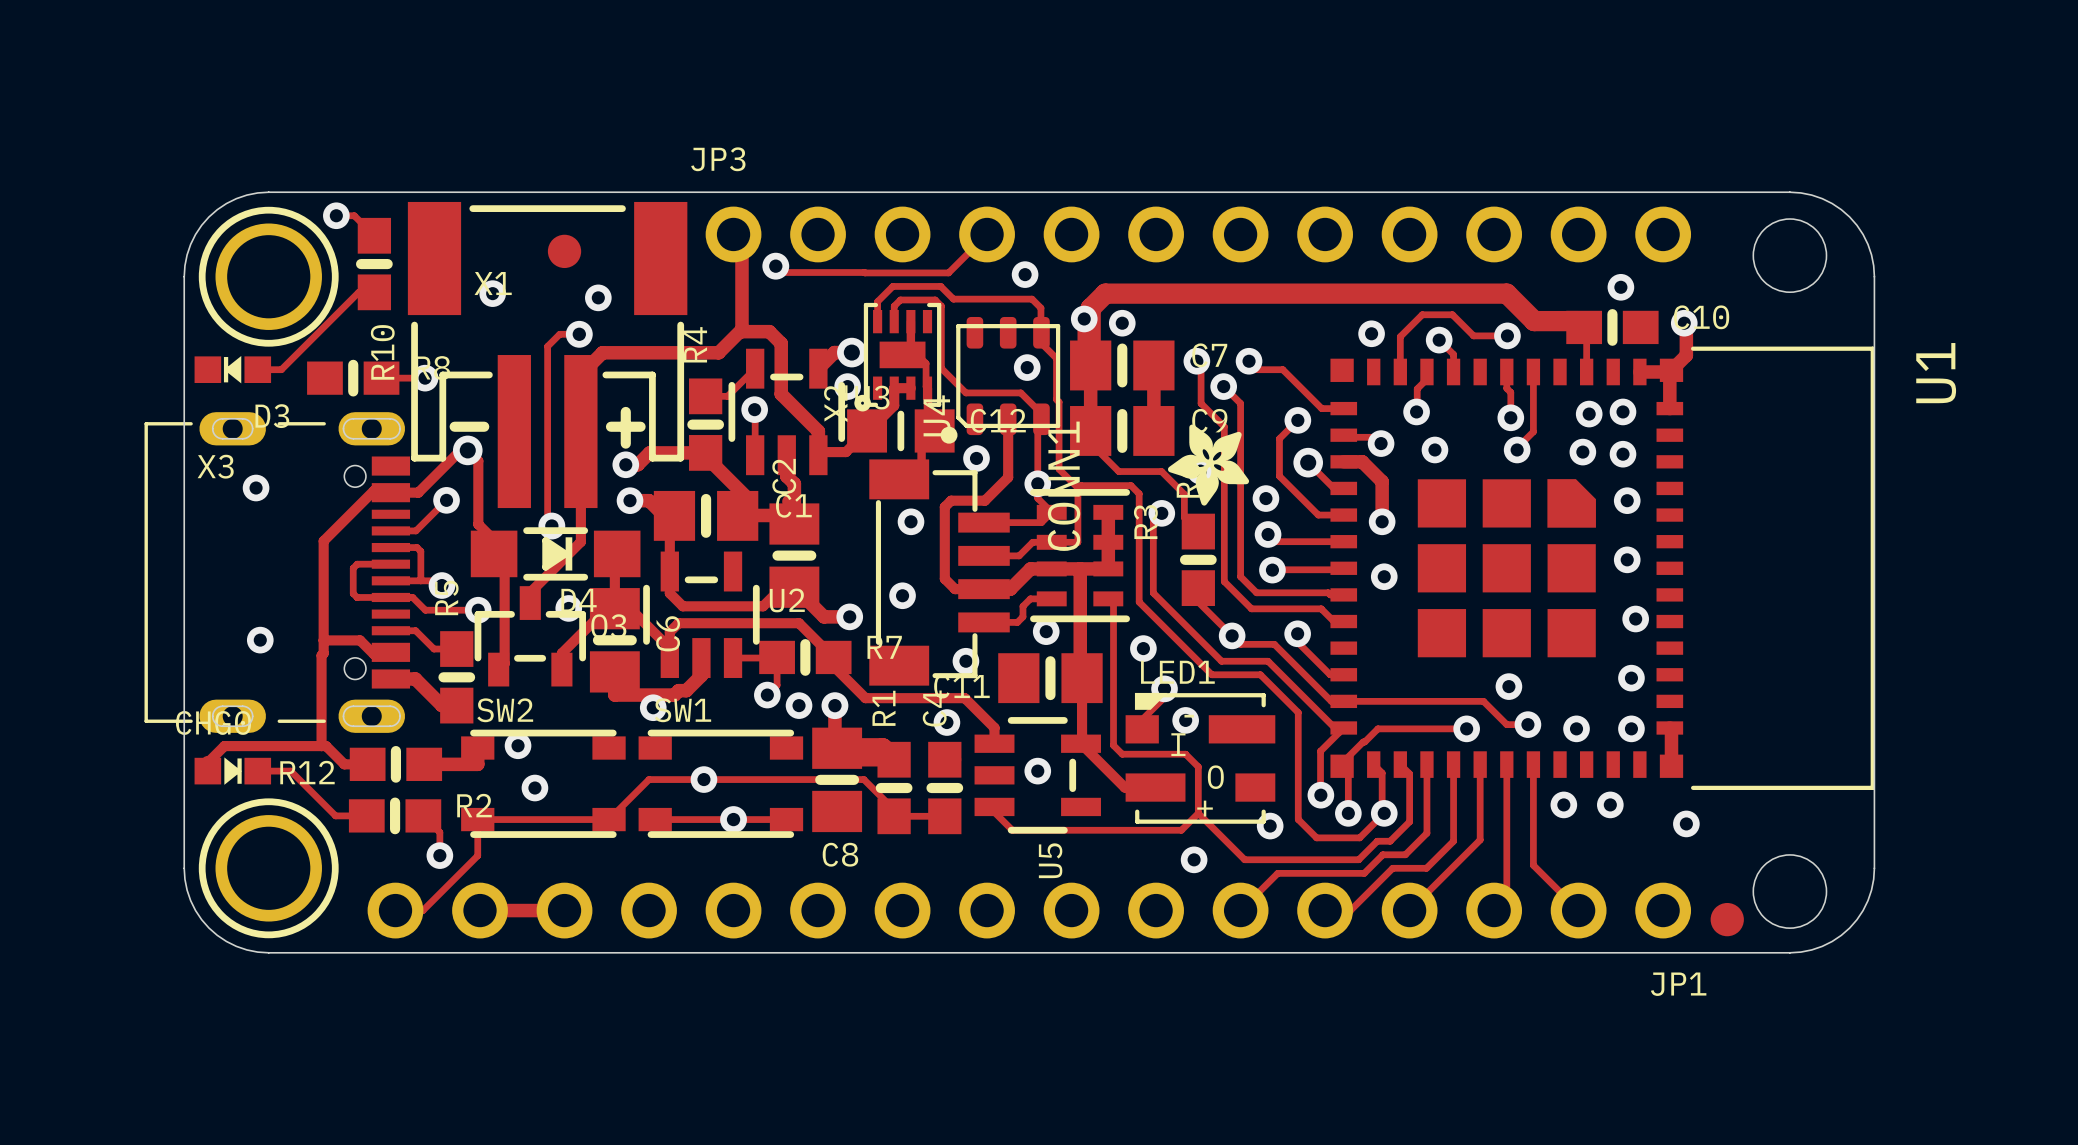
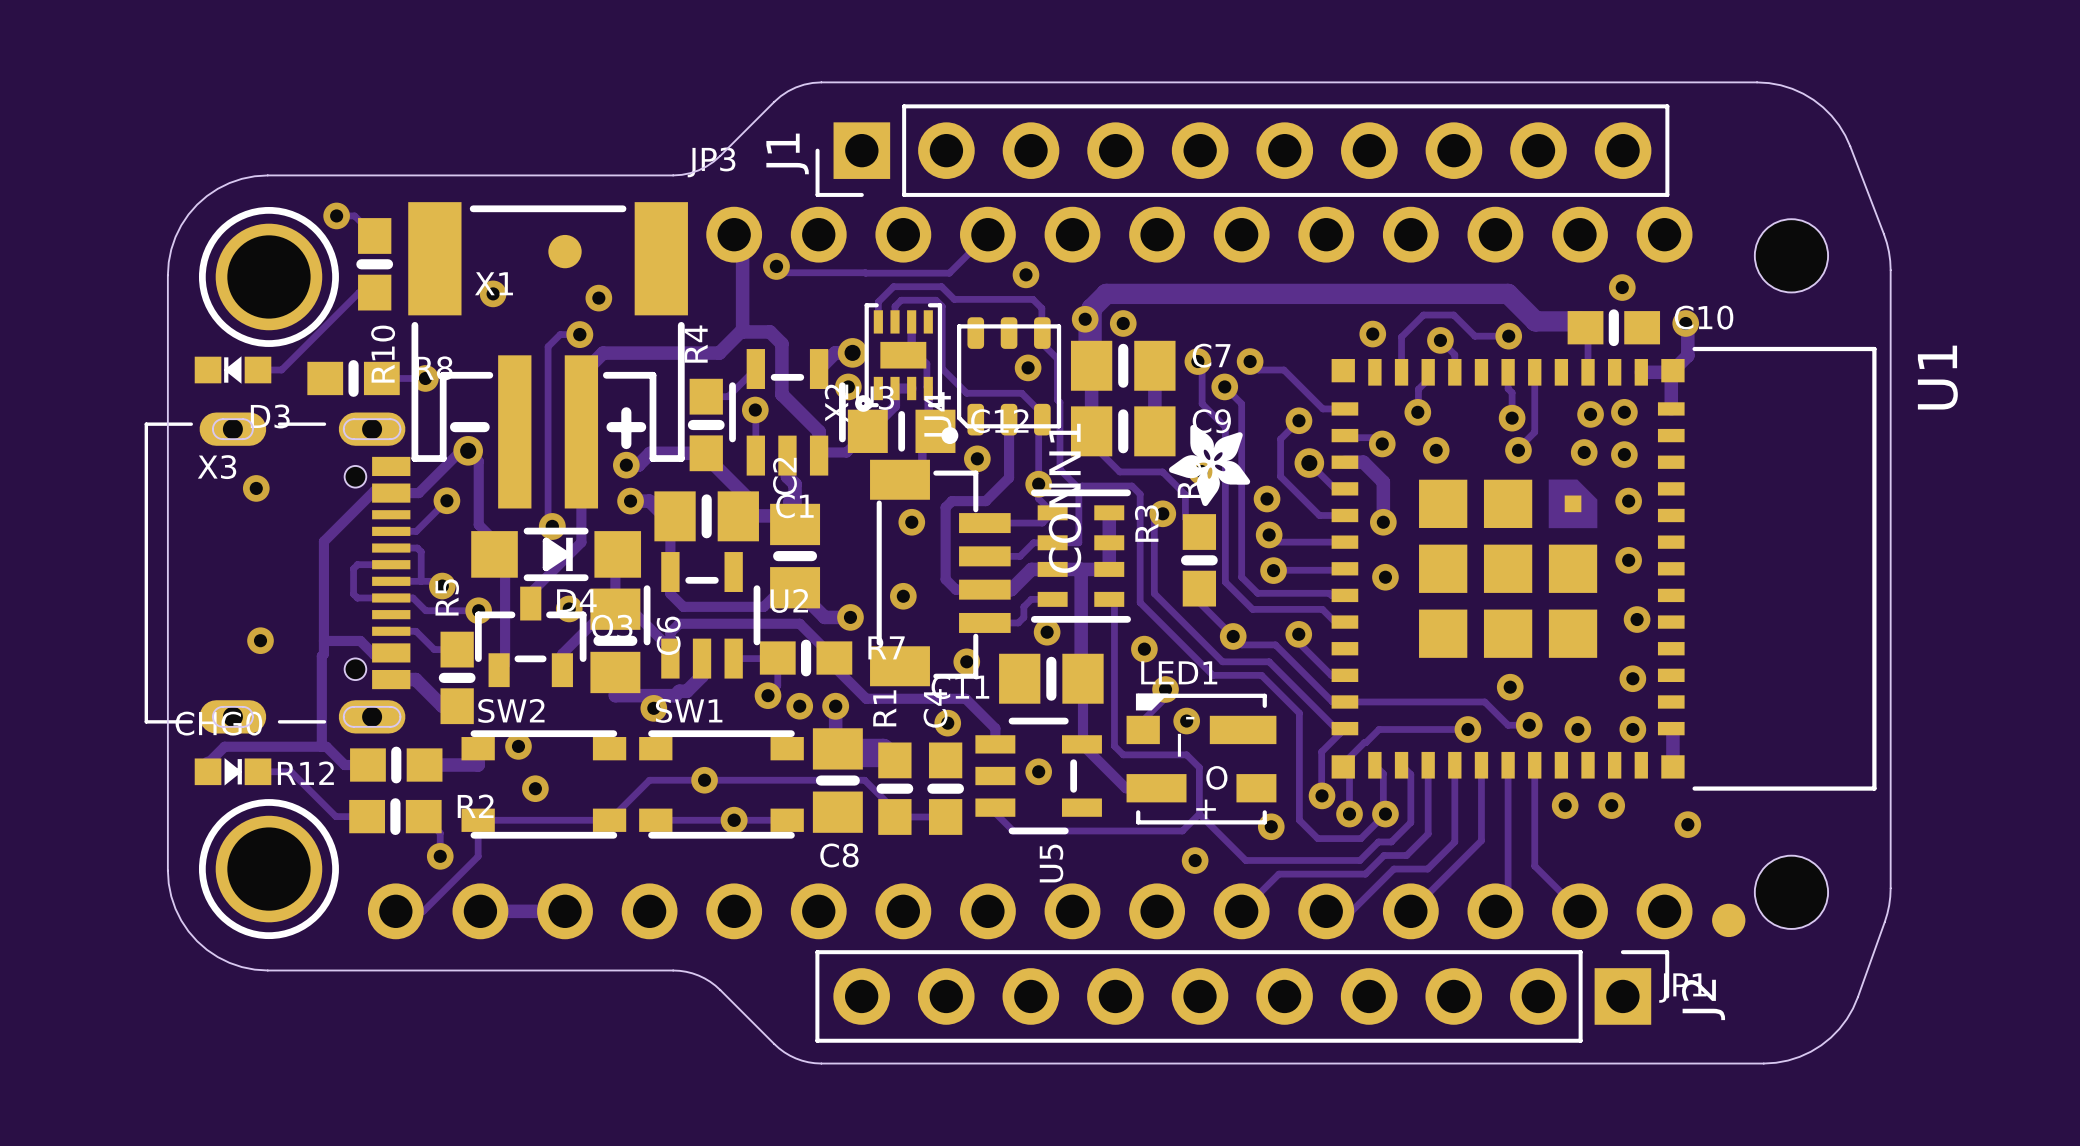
J1: none -> (1242, 150)
board edge: (268, 192) (1789, 192) (1822, 198) (1849, 216) (1863, 234) (1871, 254) (1874, 276) (1874, 868) (1867, 900) (1849, 928) (1832, 941) (1811, 949) (1789, 952) (268, 952) (236, 946) (217, 935) (201, 919) (190, 900) (184, 879) (184, 276) (190, 244) (208, 216) (236, 198) (268, 192) -> (821, 82) (795, 87) (780, 96) (713, 161) (690, 173) (673, 175) (254, 176) (241, 178) (217, 188) (197, 204) (188, 214) (175, 237) (168, 262) (167, 275) (167, 870) (171, 896) (175, 908) (188, 931) (197, 941) (206, 949) (229, 962) (254, 969) (267, 970) (686, 971) (704, 978) (715, 985) (784, 1052) (802, 1060) (814, 1063) (1763, 1063) (1799, 1056) (1821, 1045) (1839, 1028) (1857, 997) (1884, 921) (1890, 896) (1890, 270) (1886, 243) (1850, 146) (1839, 125) (1823, 107) (1792, 88) (1757, 82) (821, 82)
J2: none -> (1242, 996)

